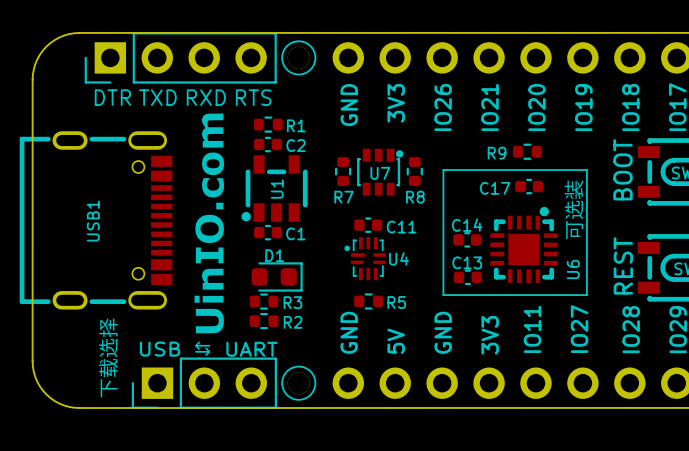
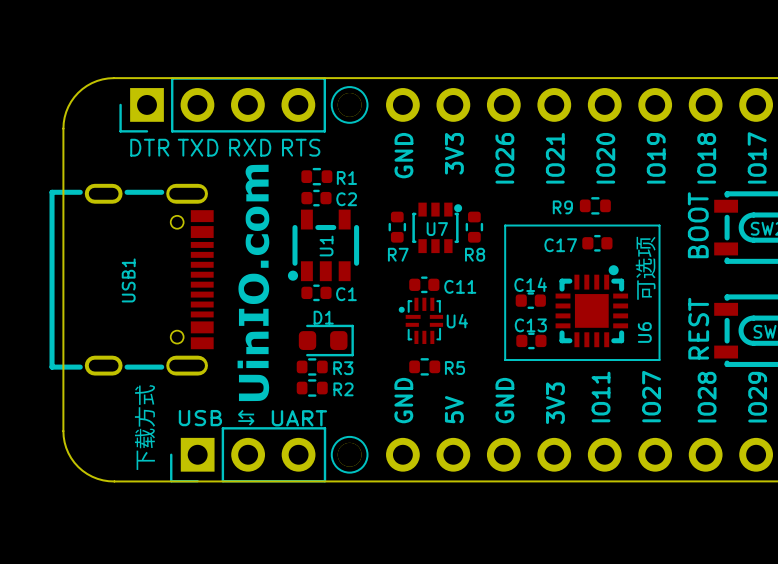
text: 可选装 (574, 209) -> 可选项 (645, 268)
text: 下载选择 (108, 357) -> 下载方式 (144, 427)

